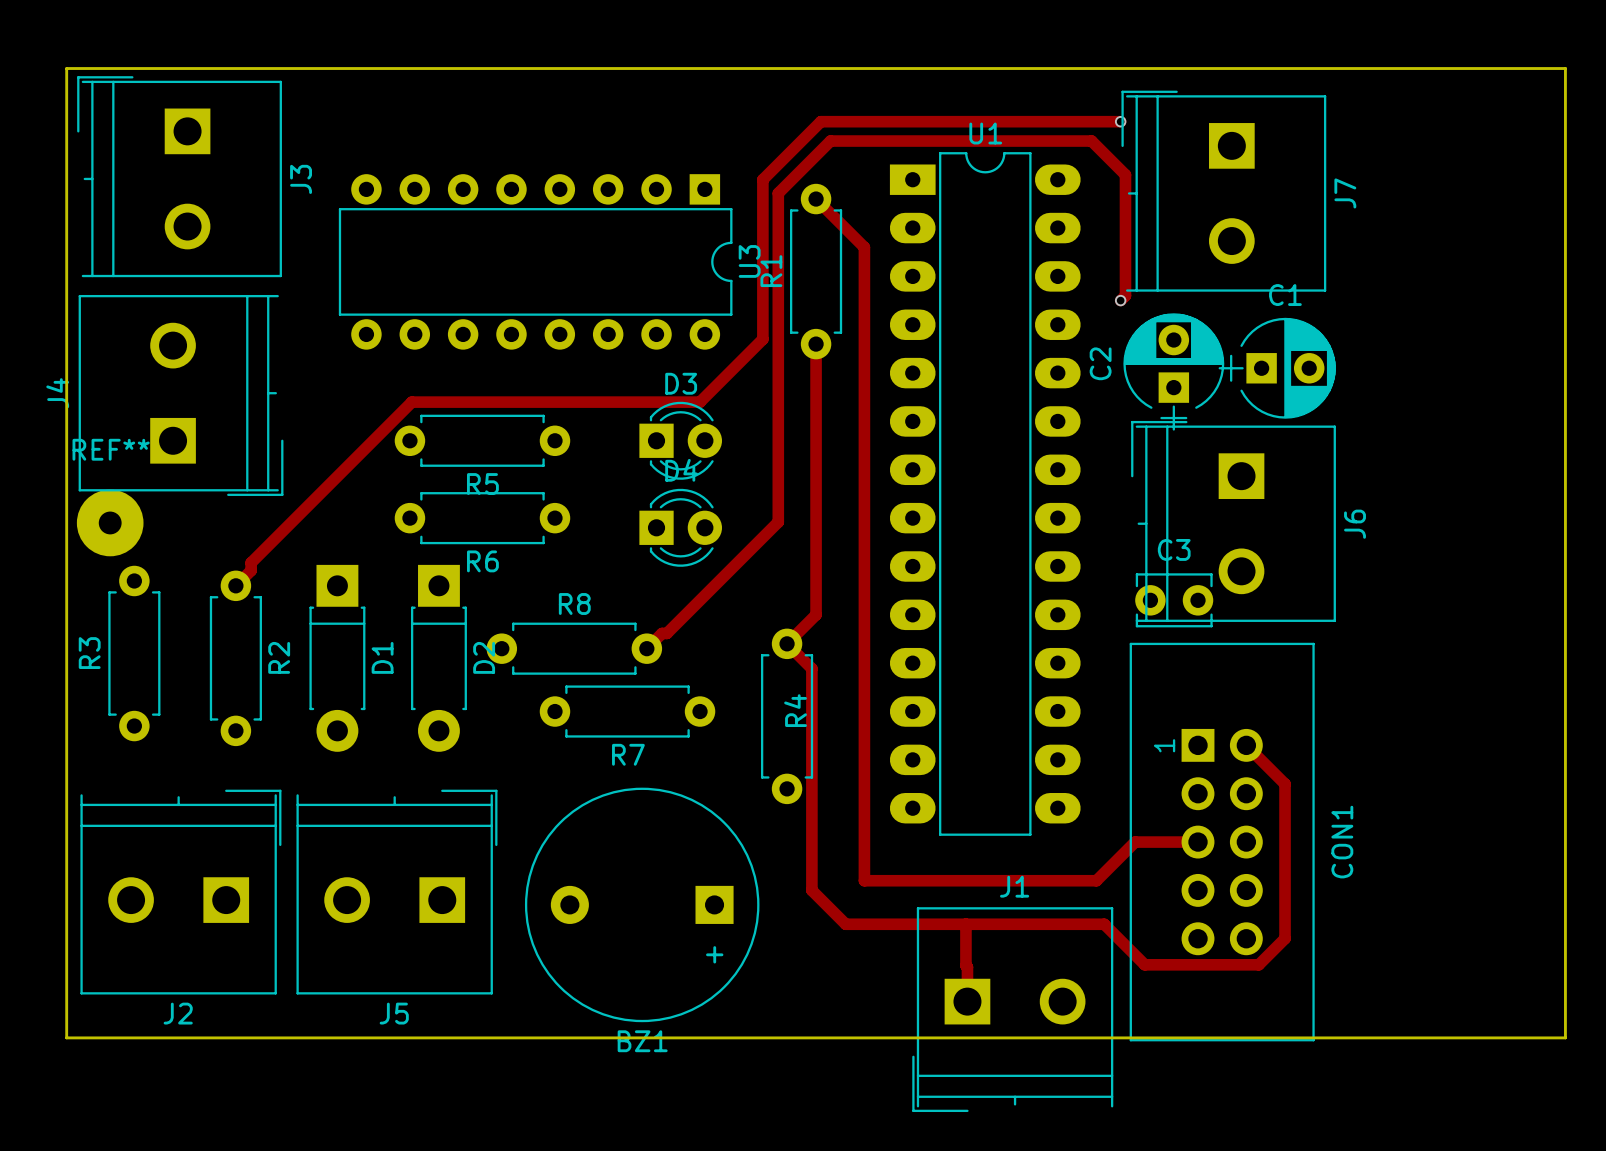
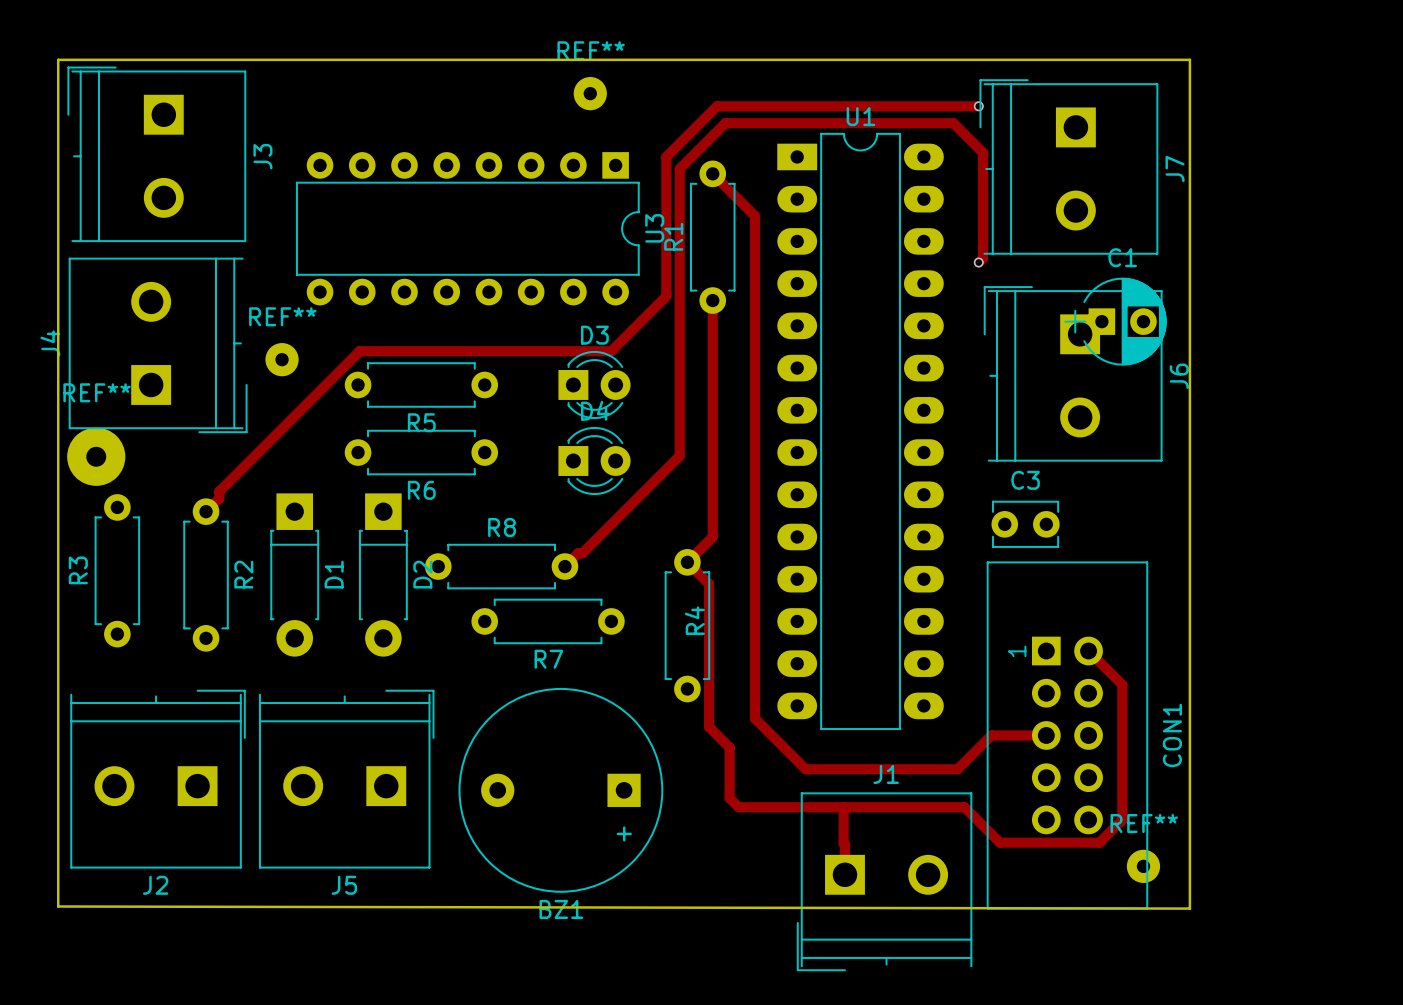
board edge: (1362, 68) (1565, 68) (1565, 1037) (66, 1037) -> (1189, 59) (1189, 908) (58, 906)
REF**: none -> (590, 93)
C2: (1173, 371) -> none
REF**: none -> (282, 359)
J6 position: (1233, 521) -> (1073, 373)
track: (864, 822) (864, 880) (922, 880) -> (754, 718) (805, 769)
track: (811, 832) (811, 890) (835, 913) -> (709, 727) (729, 747) (729, 798)
REF**: none -> (1143, 866)

